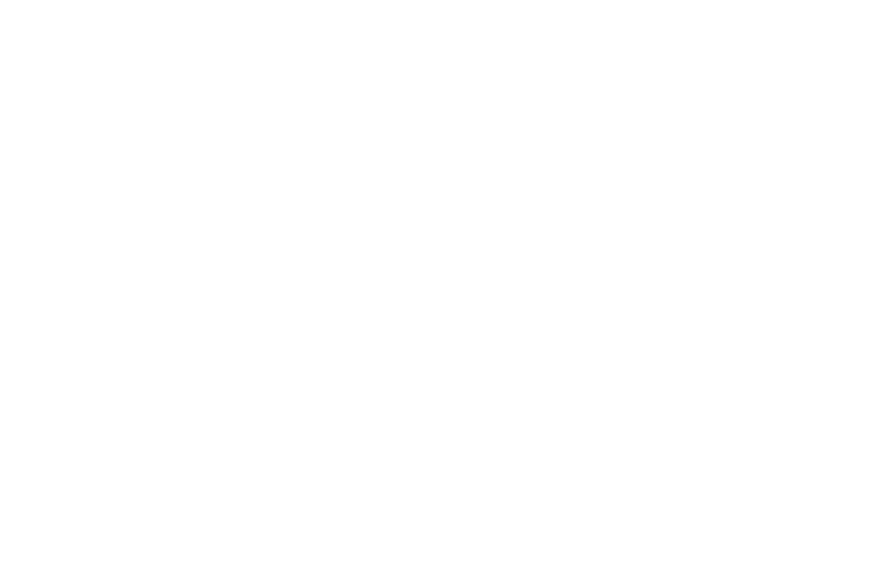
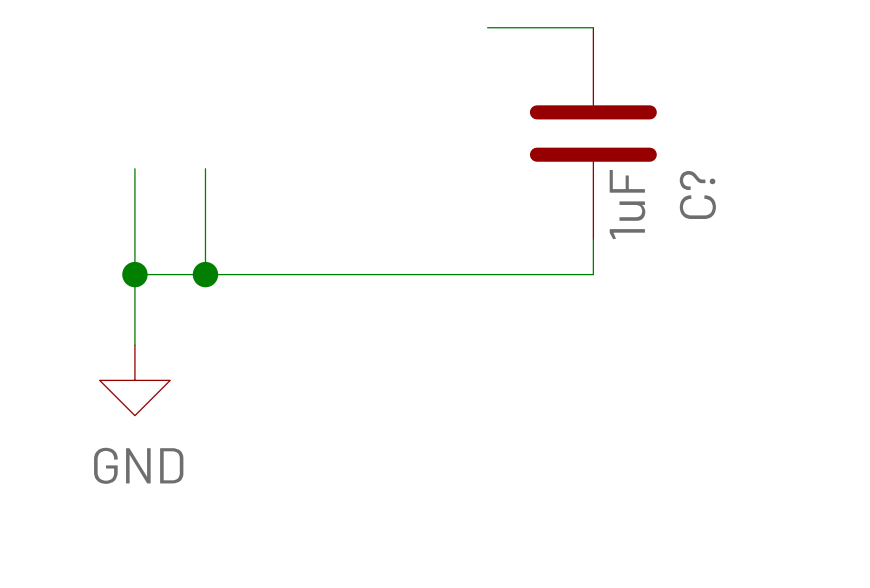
wire: none -> (487, 27) (593, 27)
C?: none -> 1uF (593, 133)
wire: none -> (134, 168) (134, 345)
wire: none -> (205, 168) (205, 274)
wire: none -> (593, 239) (593, 274) (134, 274)
junction: none -> (134, 274)
junction: none -> (205, 274)
power symbol: none -> GND (134, 380)

